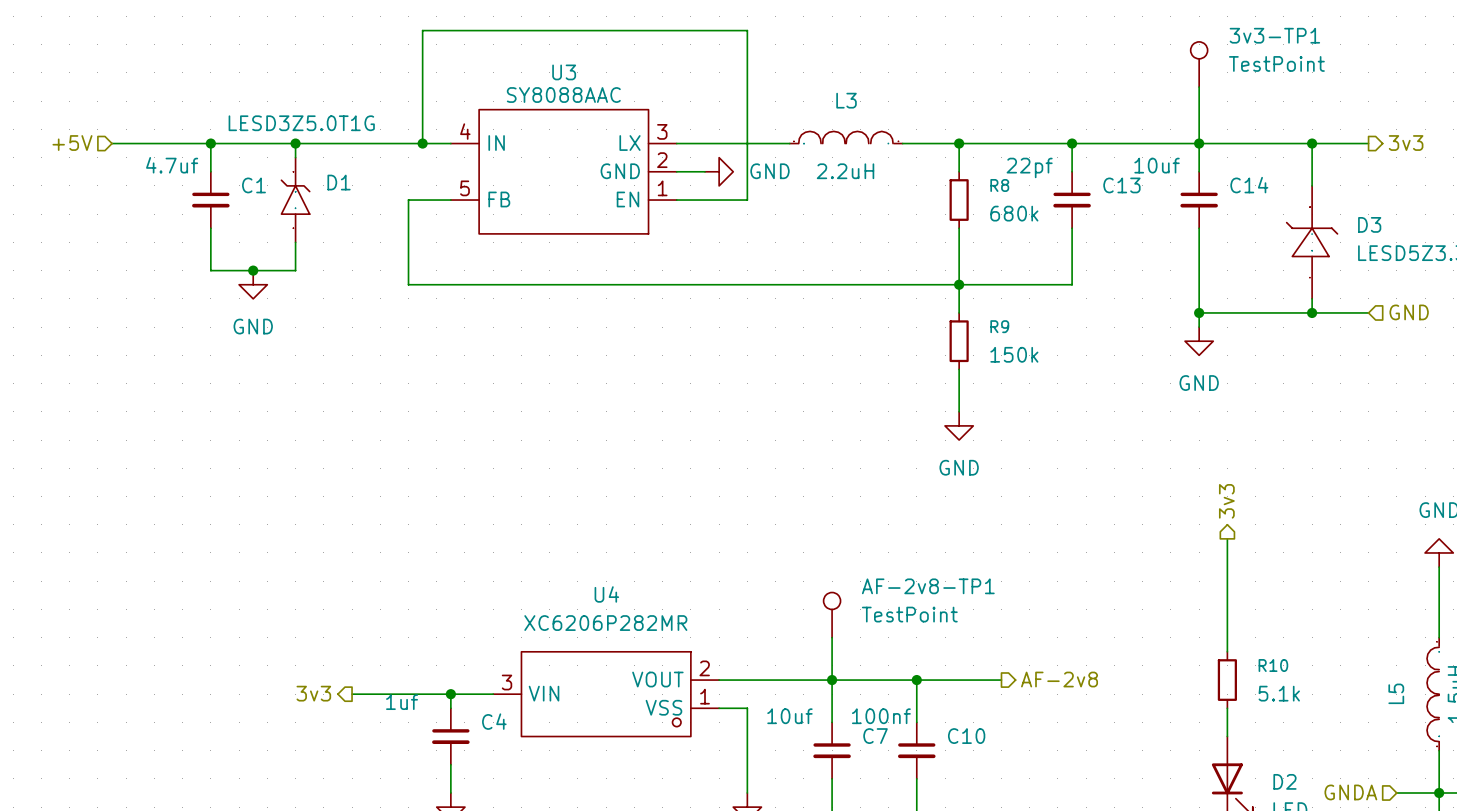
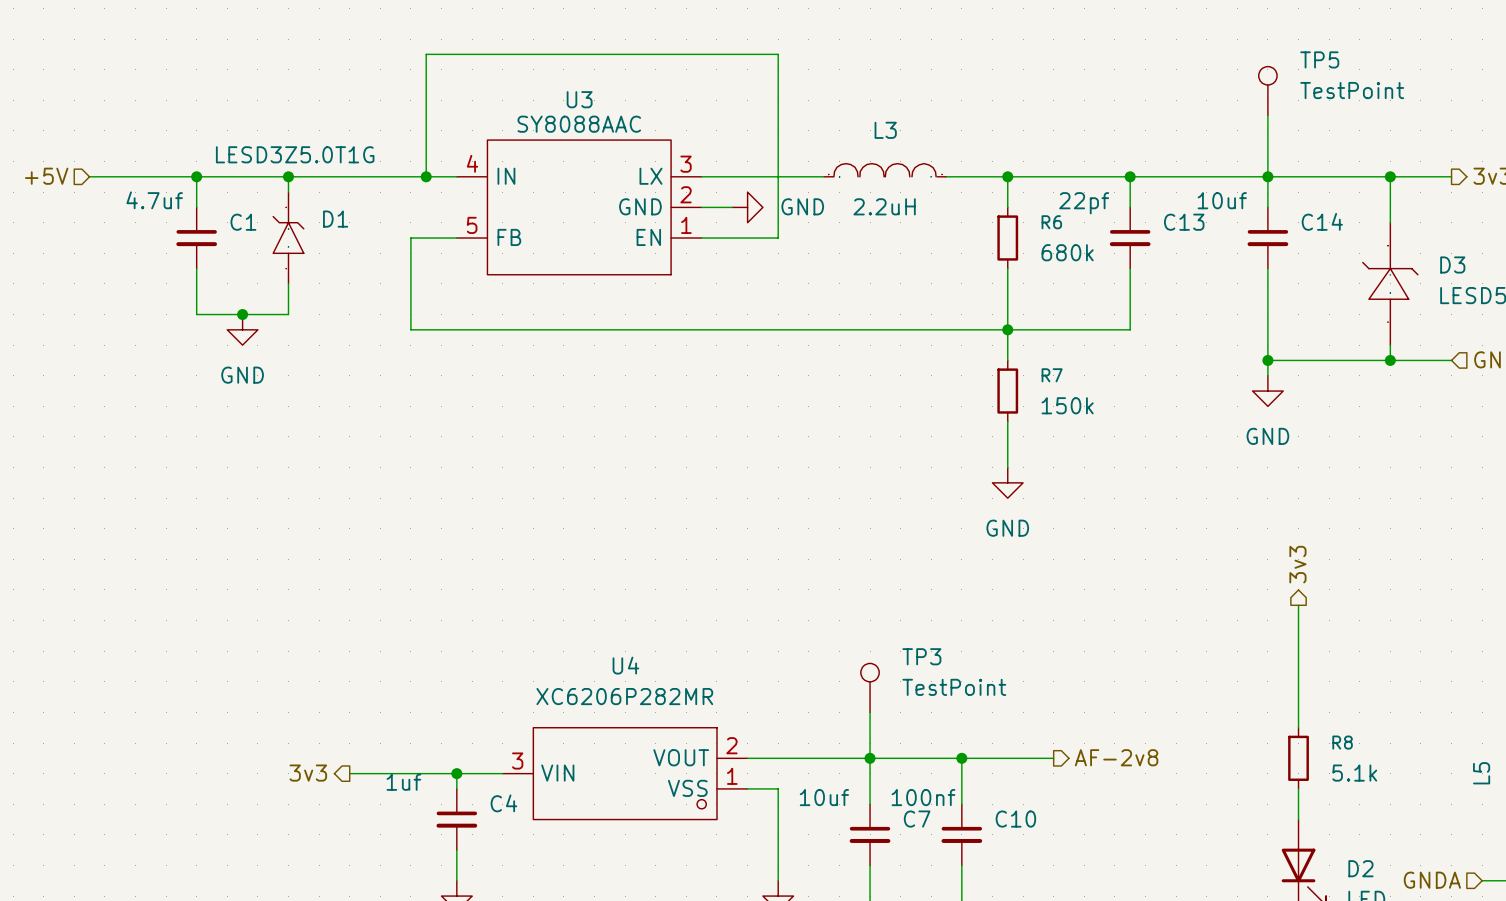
3v3-TP1 name: 3v3-TP1 (1274, 35) -> TP5 (1319, 59)
R8 name: R8 (999, 185) -> R6 (1051, 222)
R9 name: R9 (999, 326) -> R7 (1052, 375)
AF-2v8-TP1 name: AF-2v8-TP1 (928, 586) -> TP3 (921, 656)
R10 name: R10 (1273, 665) -> R8 (1342, 742)

